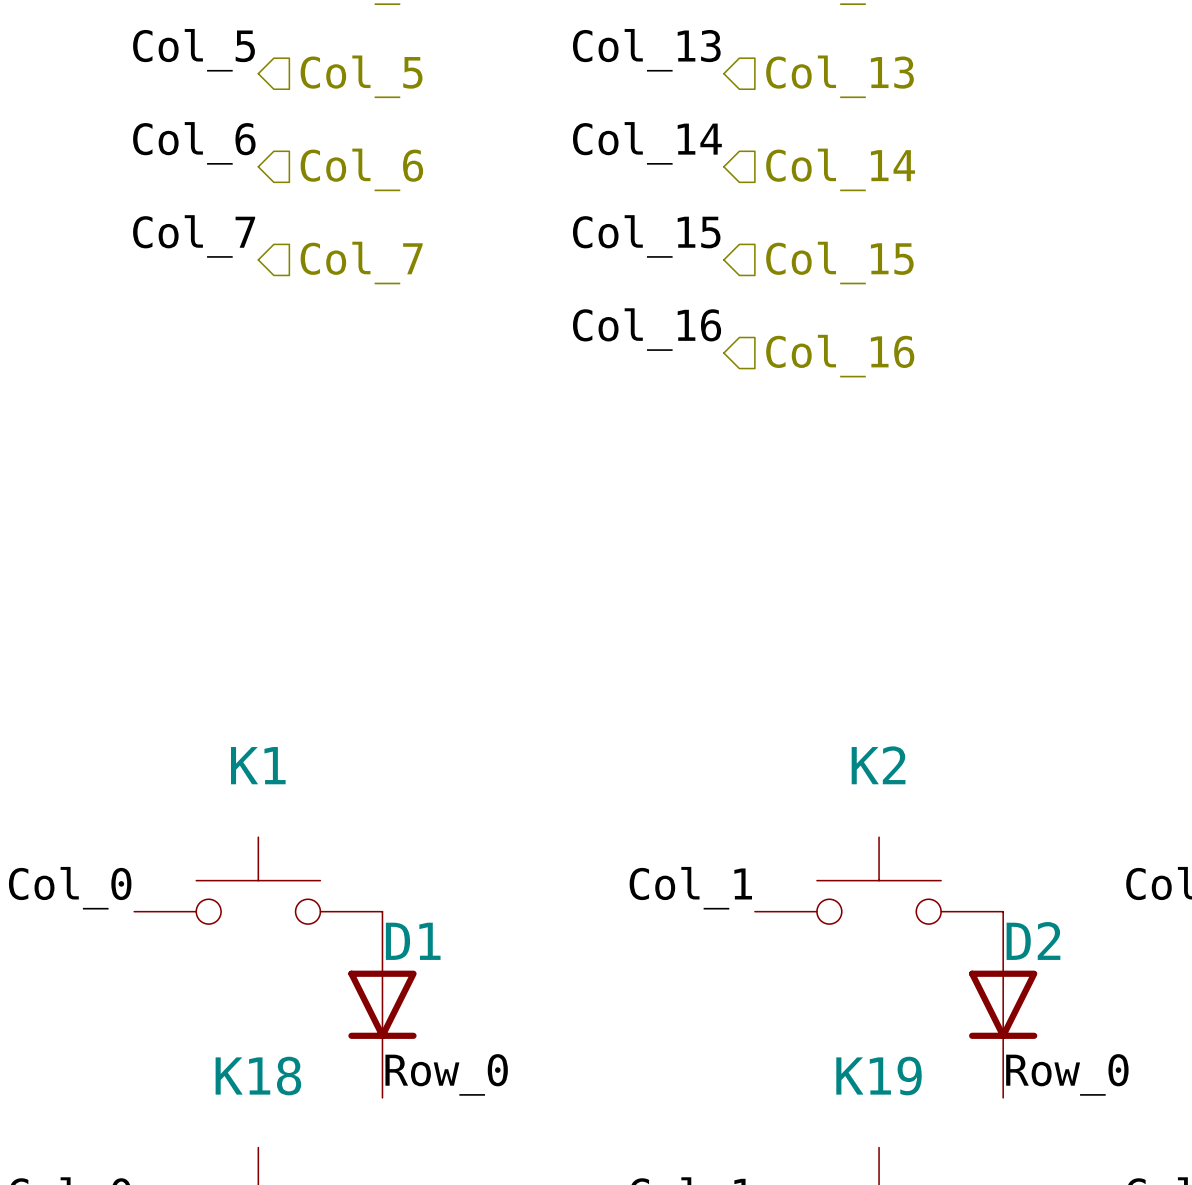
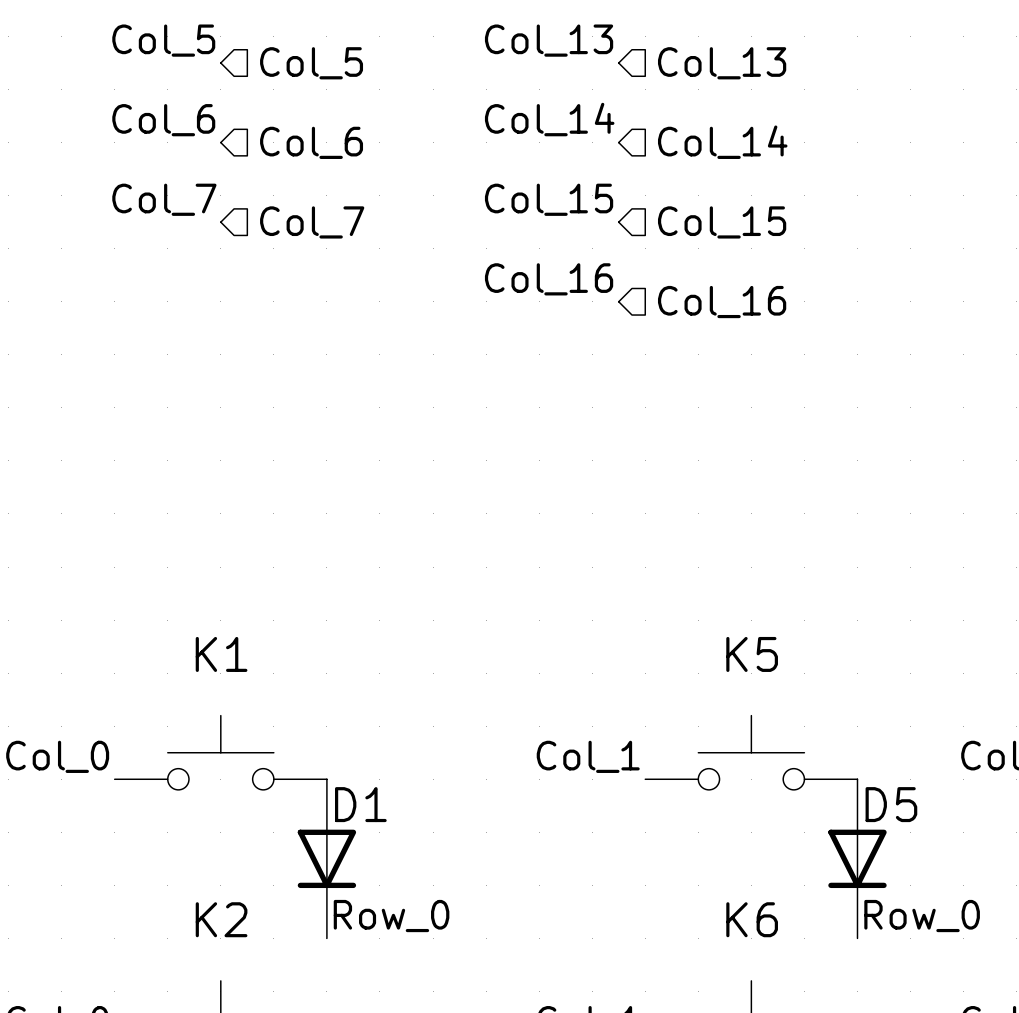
K2 name: K2 (878, 765) -> K5 (752, 654)
D2 name: D2 (1033, 940) -> D5 (891, 804)
K18 name: K18 (258, 1076) -> K2 (221, 919)
K19 name: K19 (879, 1076) -> K6 (752, 919)

